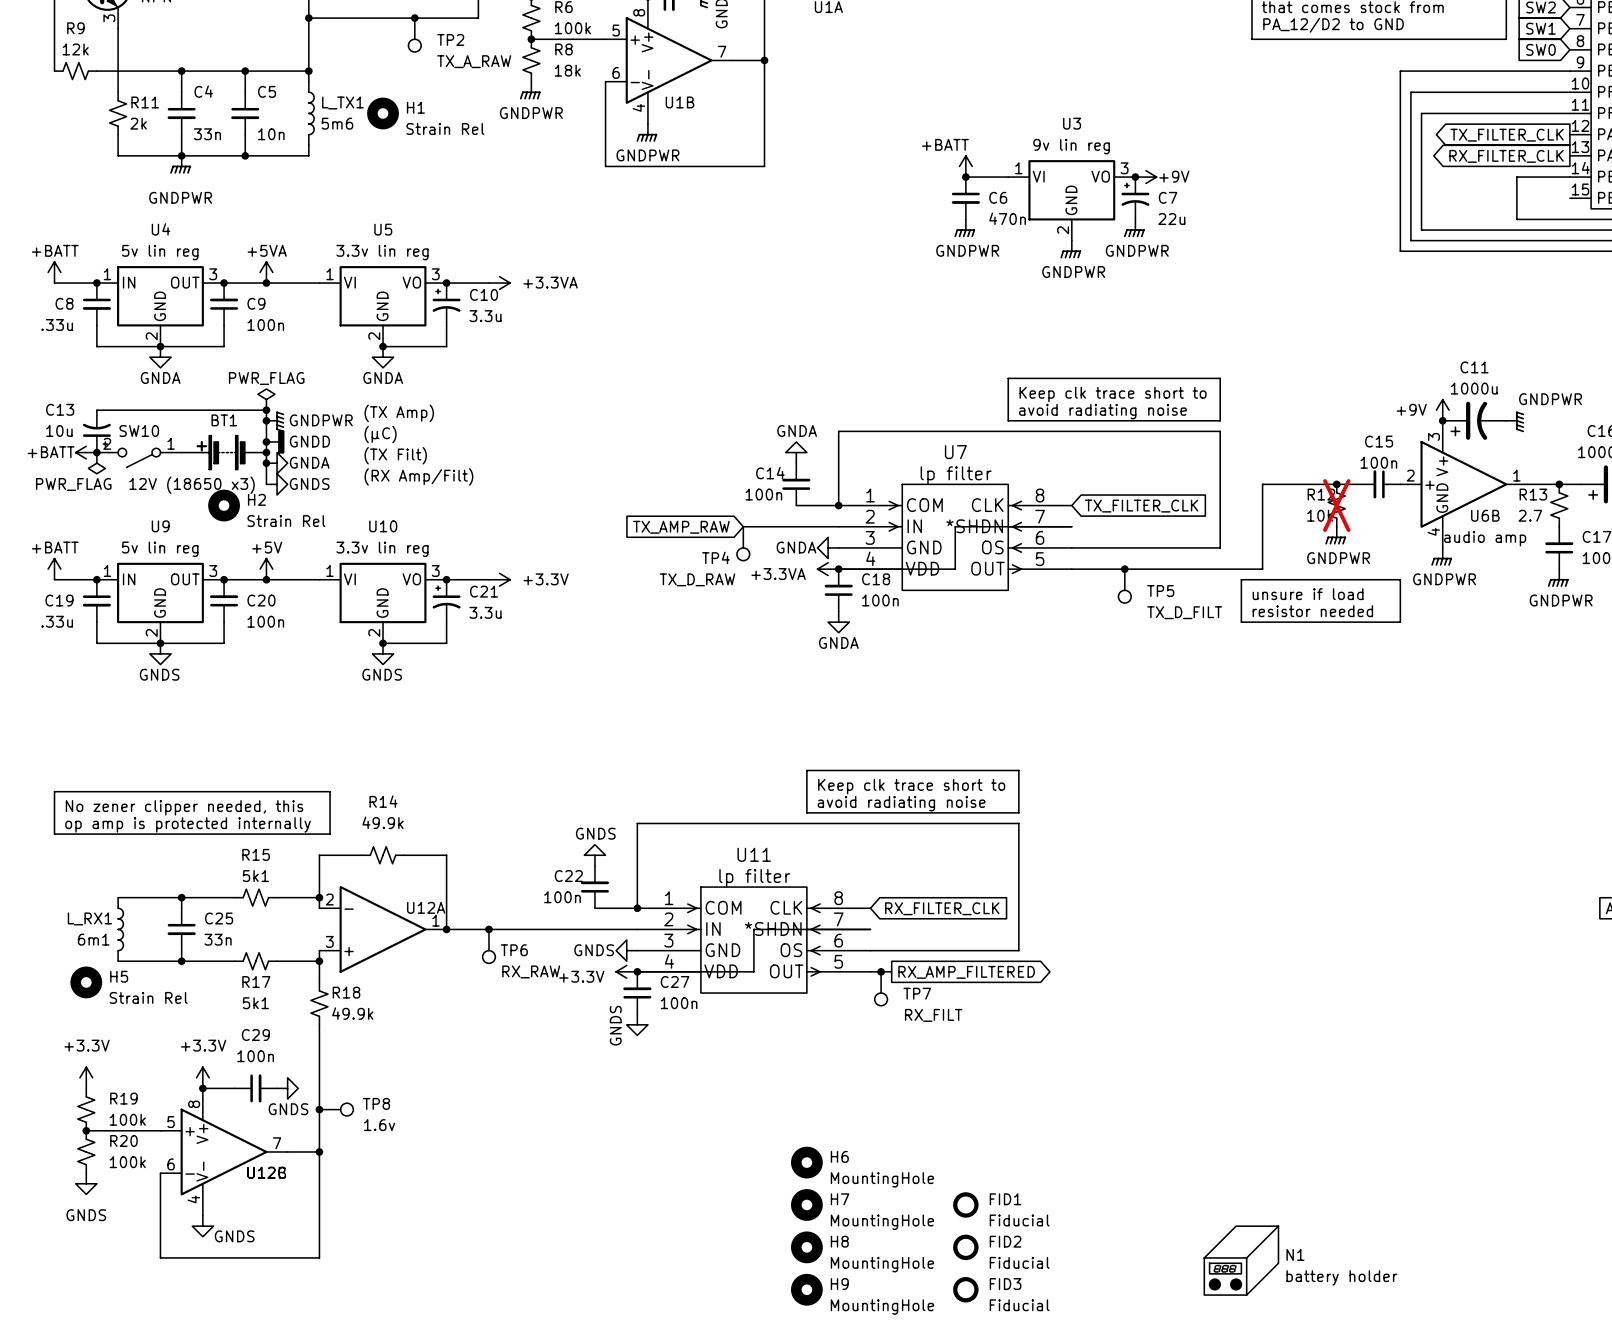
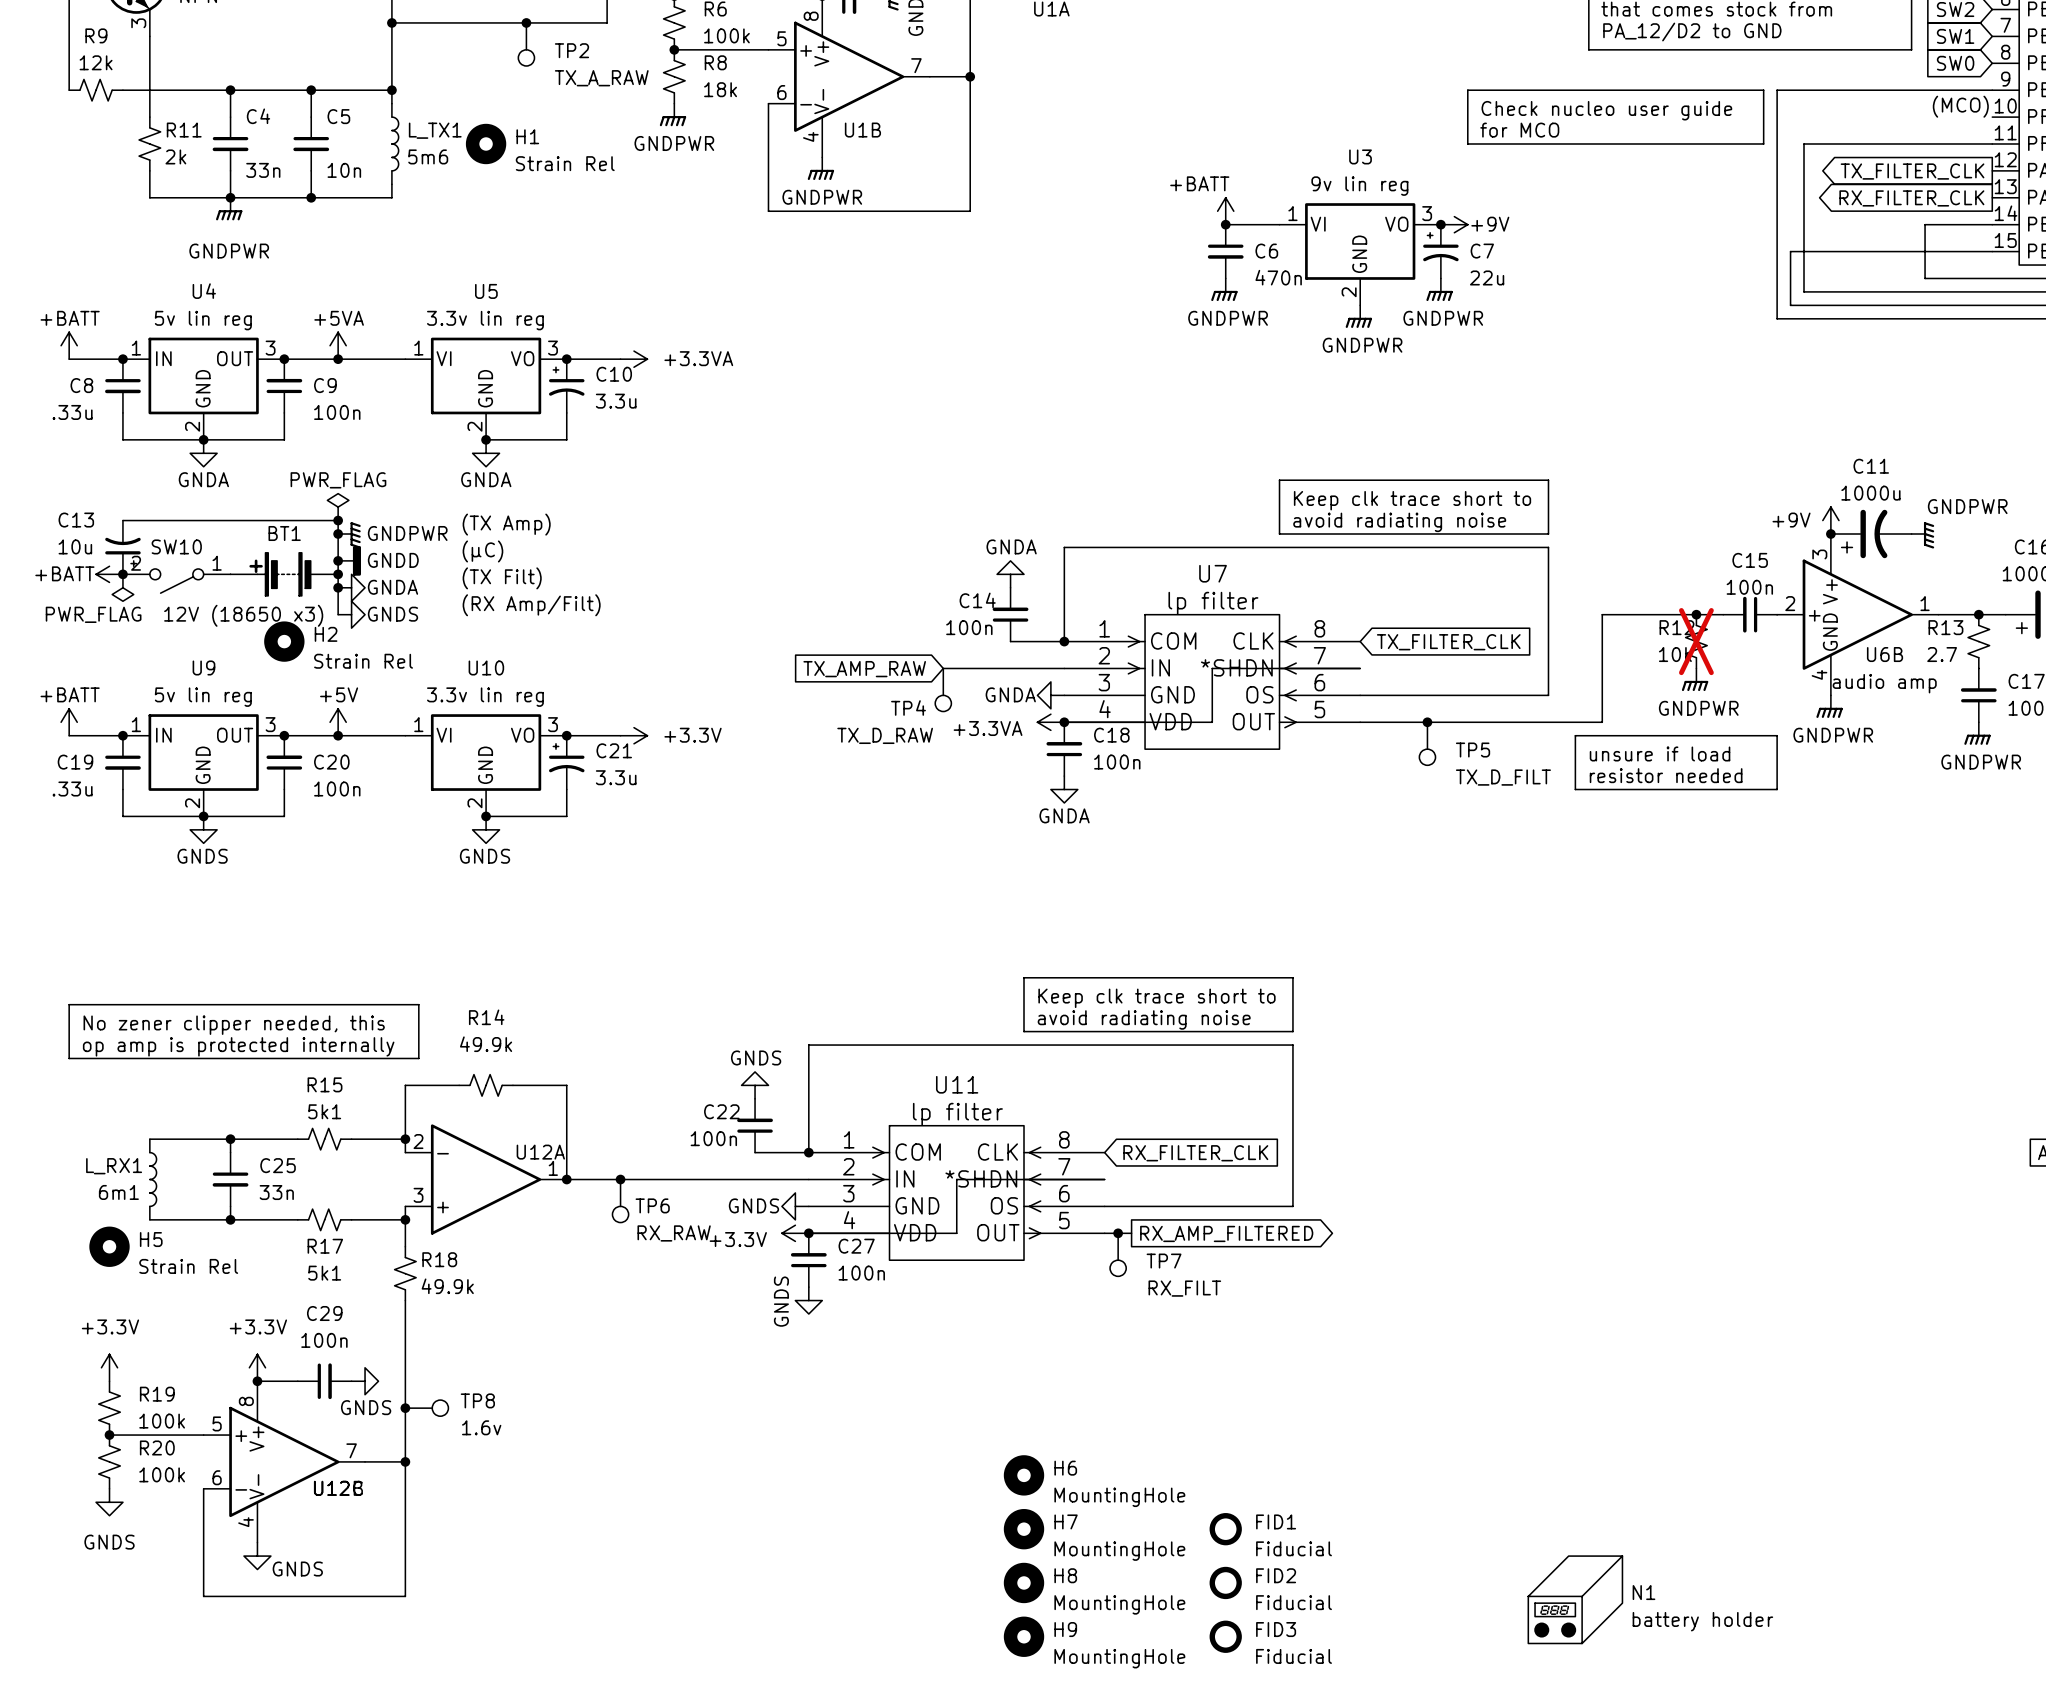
line: none -> (1467, 90) (1763, 90) (1763, 143) (1467, 143) (1467, 90)
label: none -> (MCO) (1960, 106)
text: none -> Check nucleo user guide (1606, 110)
wire: (1569, 92) (1410, 92) (1410, 198) -> (1992, 251) (1790, 251)
text: none -> for MCO (1519, 130)

